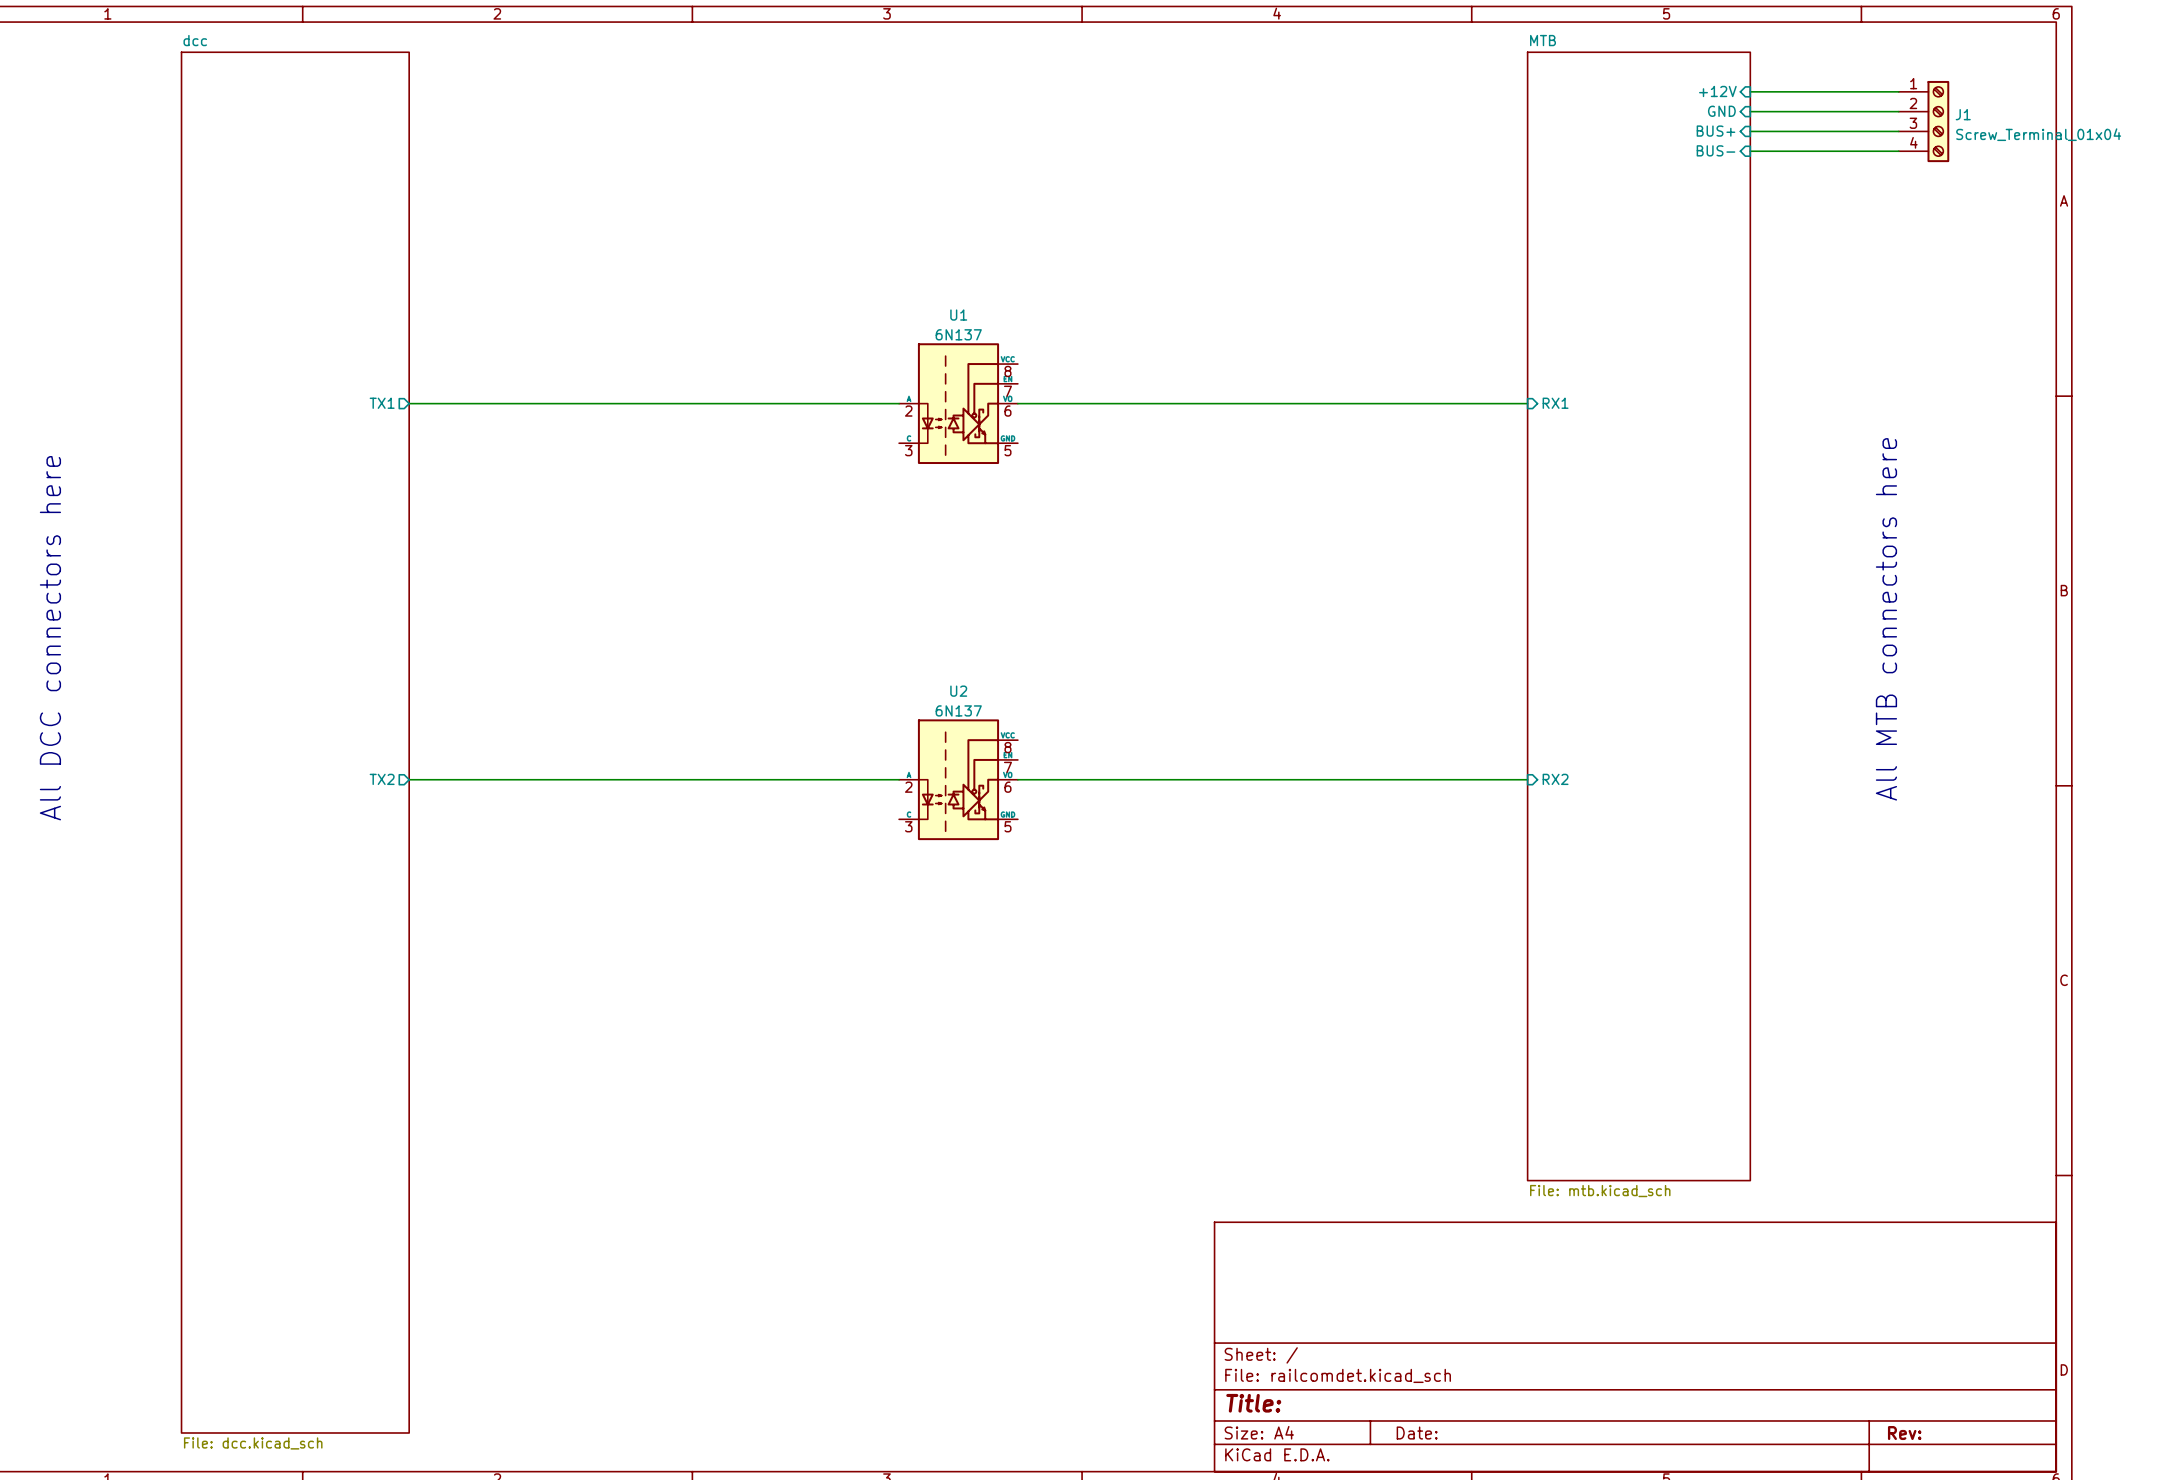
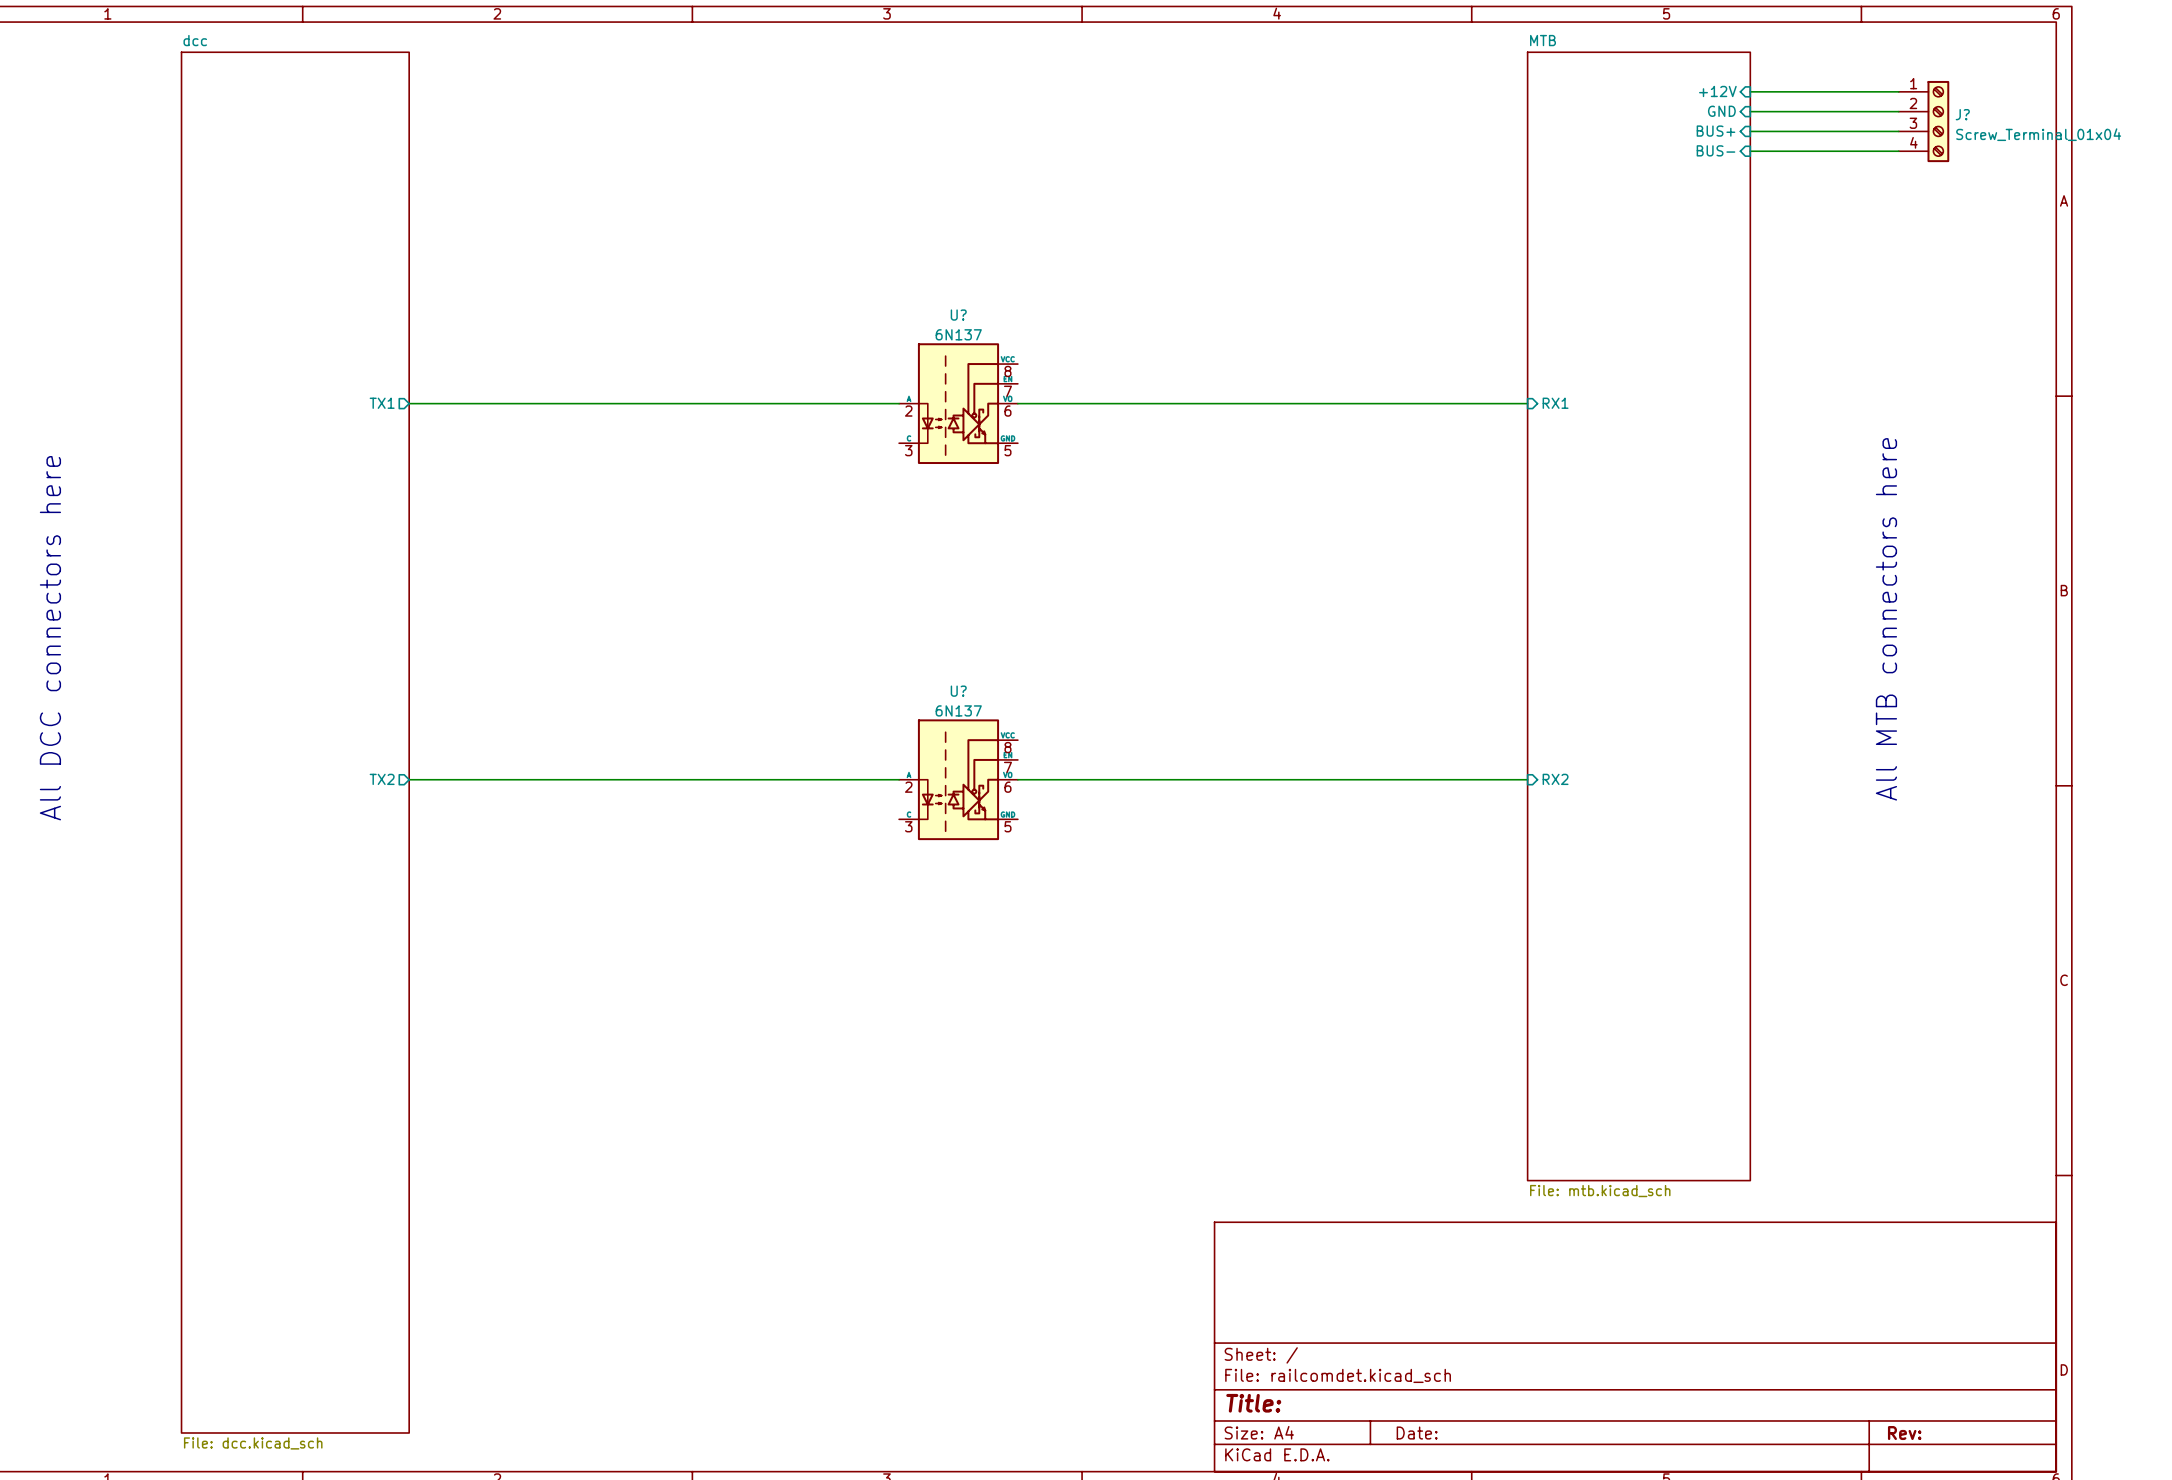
J1 name: J1 (1963, 114) -> J? (1962, 114)
U1 name: U1 (958, 315) -> U? (958, 315)
U2 name: U2 (958, 691) -> U? (958, 691)

